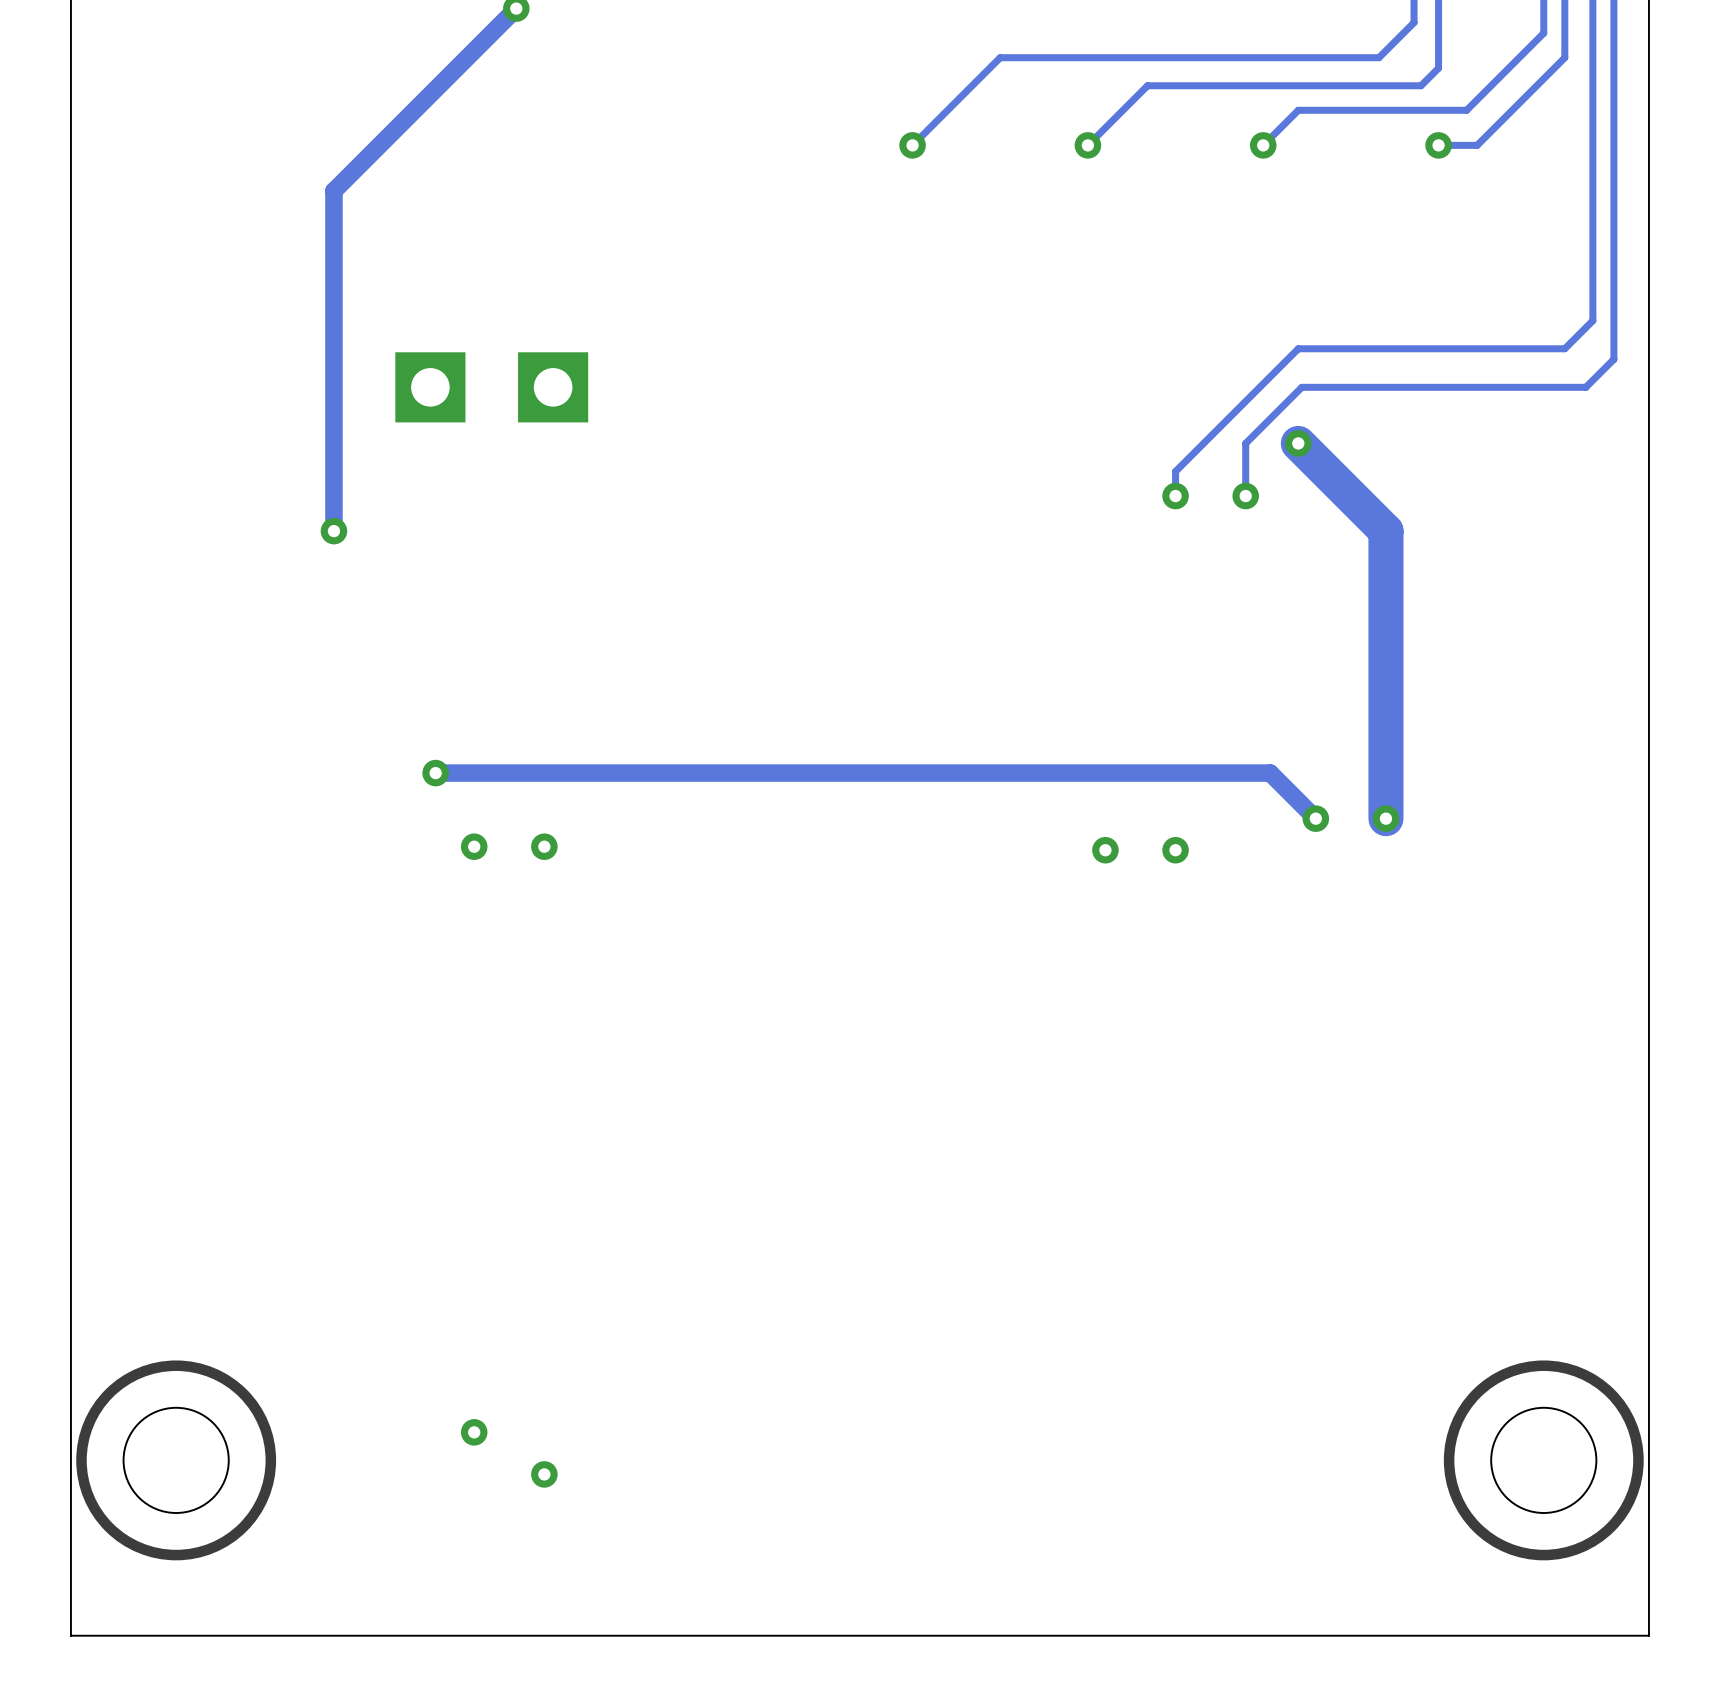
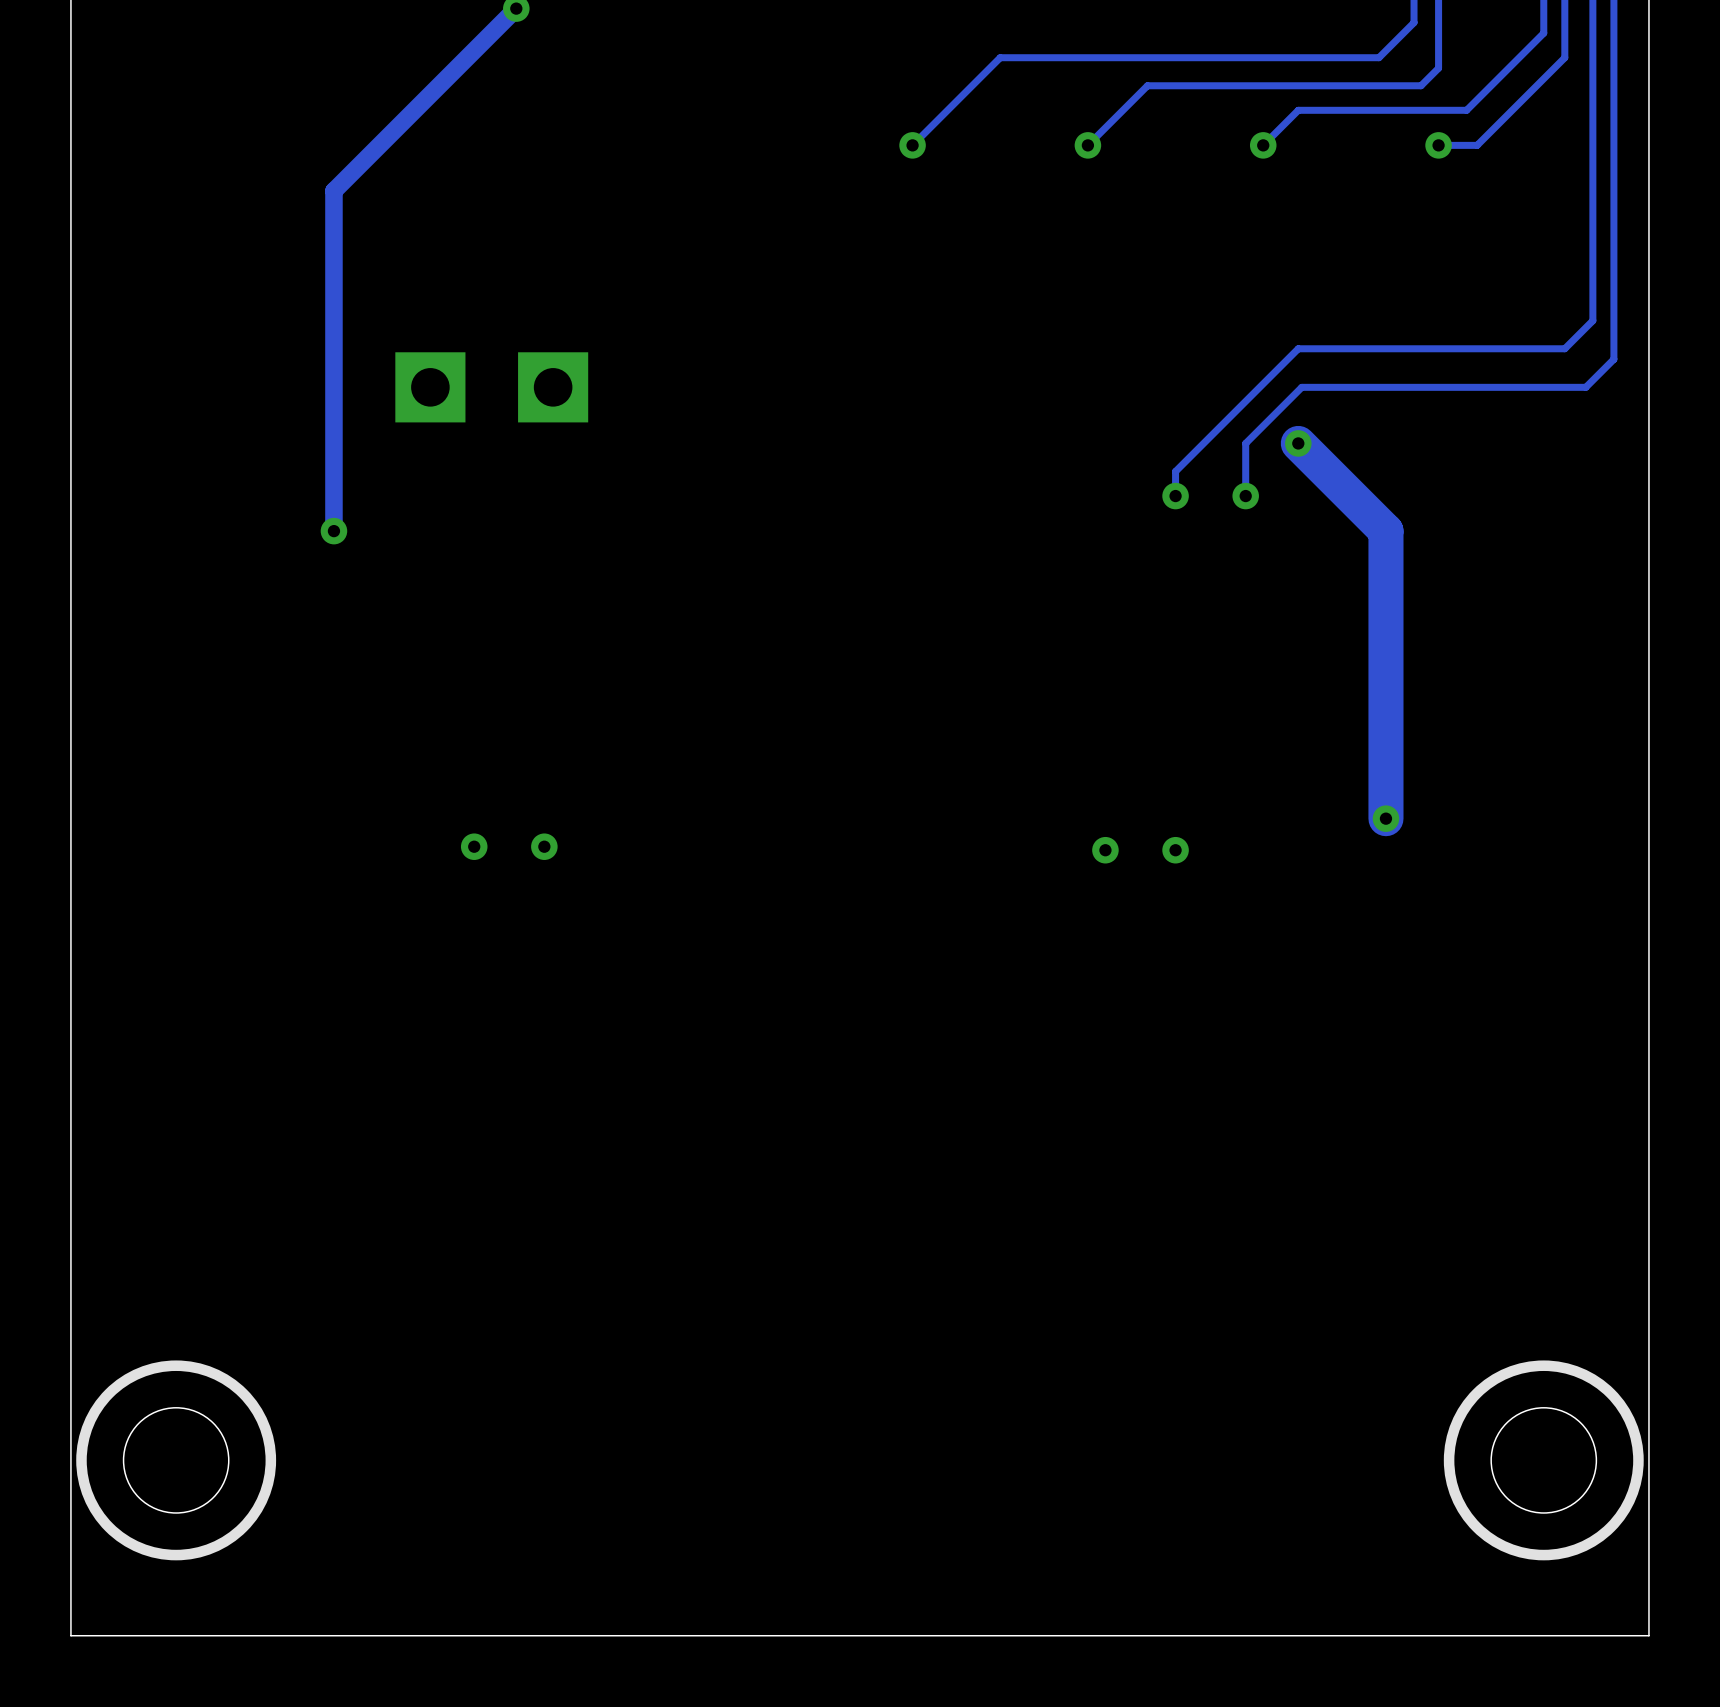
track: (435, 773) (1270, 773) (1315, 818) -> none
via: (435, 773) -> none
via: (1315, 818) -> none
via: (474, 1432) -> none
via: (544, 1474) -> none

